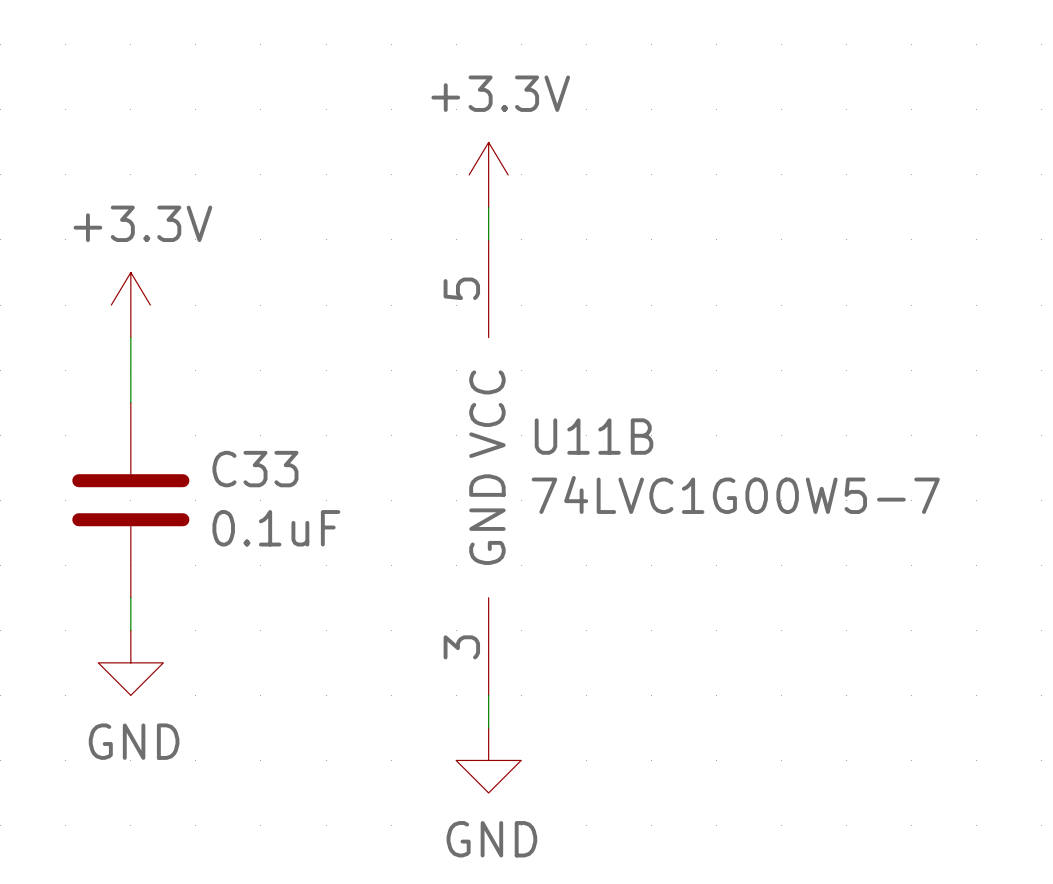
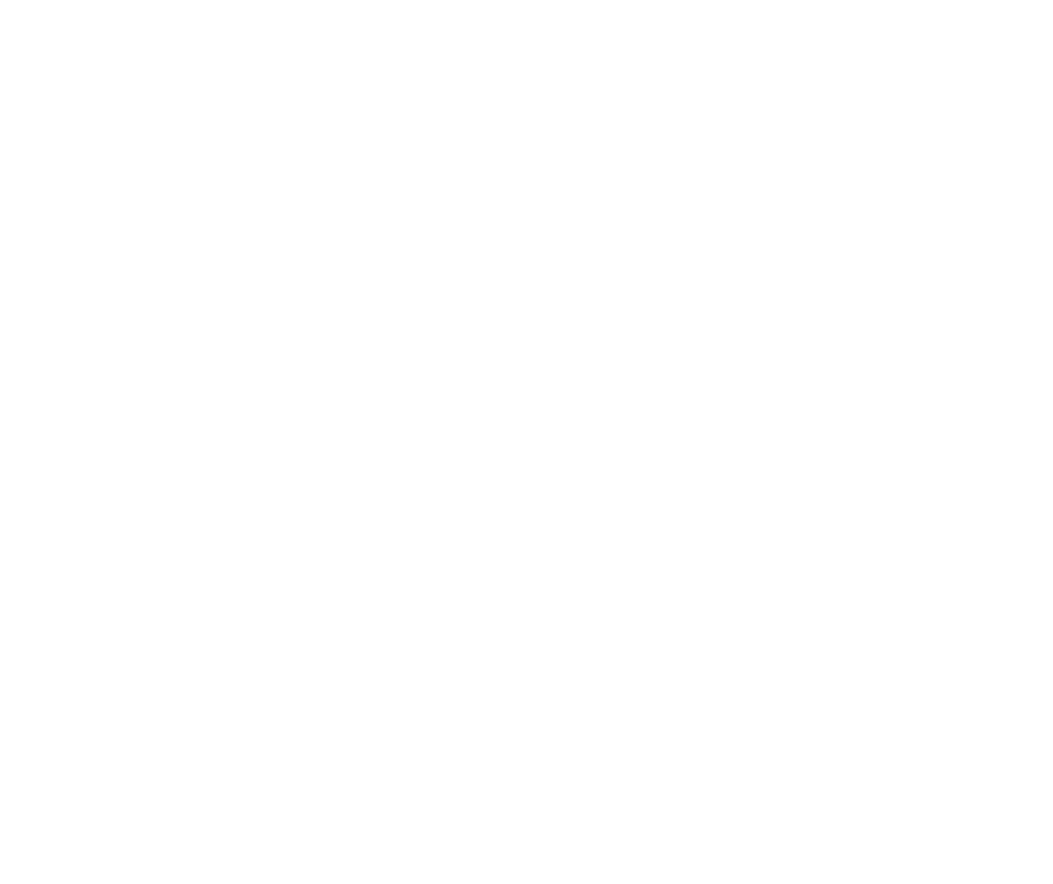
power symbol: +3.3V (488, 174) -> none
wire: (488, 207) (488, 239) -> none
power symbol: +3.3V (130, 305) -> none
wire: (130, 337) (130, 402) -> none
U11B: 74LVC1G00W5-7 (488, 467) -> none
C33: 0.1uF (130, 500) -> none
wire: (130, 597) (130, 630) -> none
power symbol: GND (130, 662) -> none
wire: (488, 695) (488, 727) -> none
power symbol: GND (488, 760) -> none

